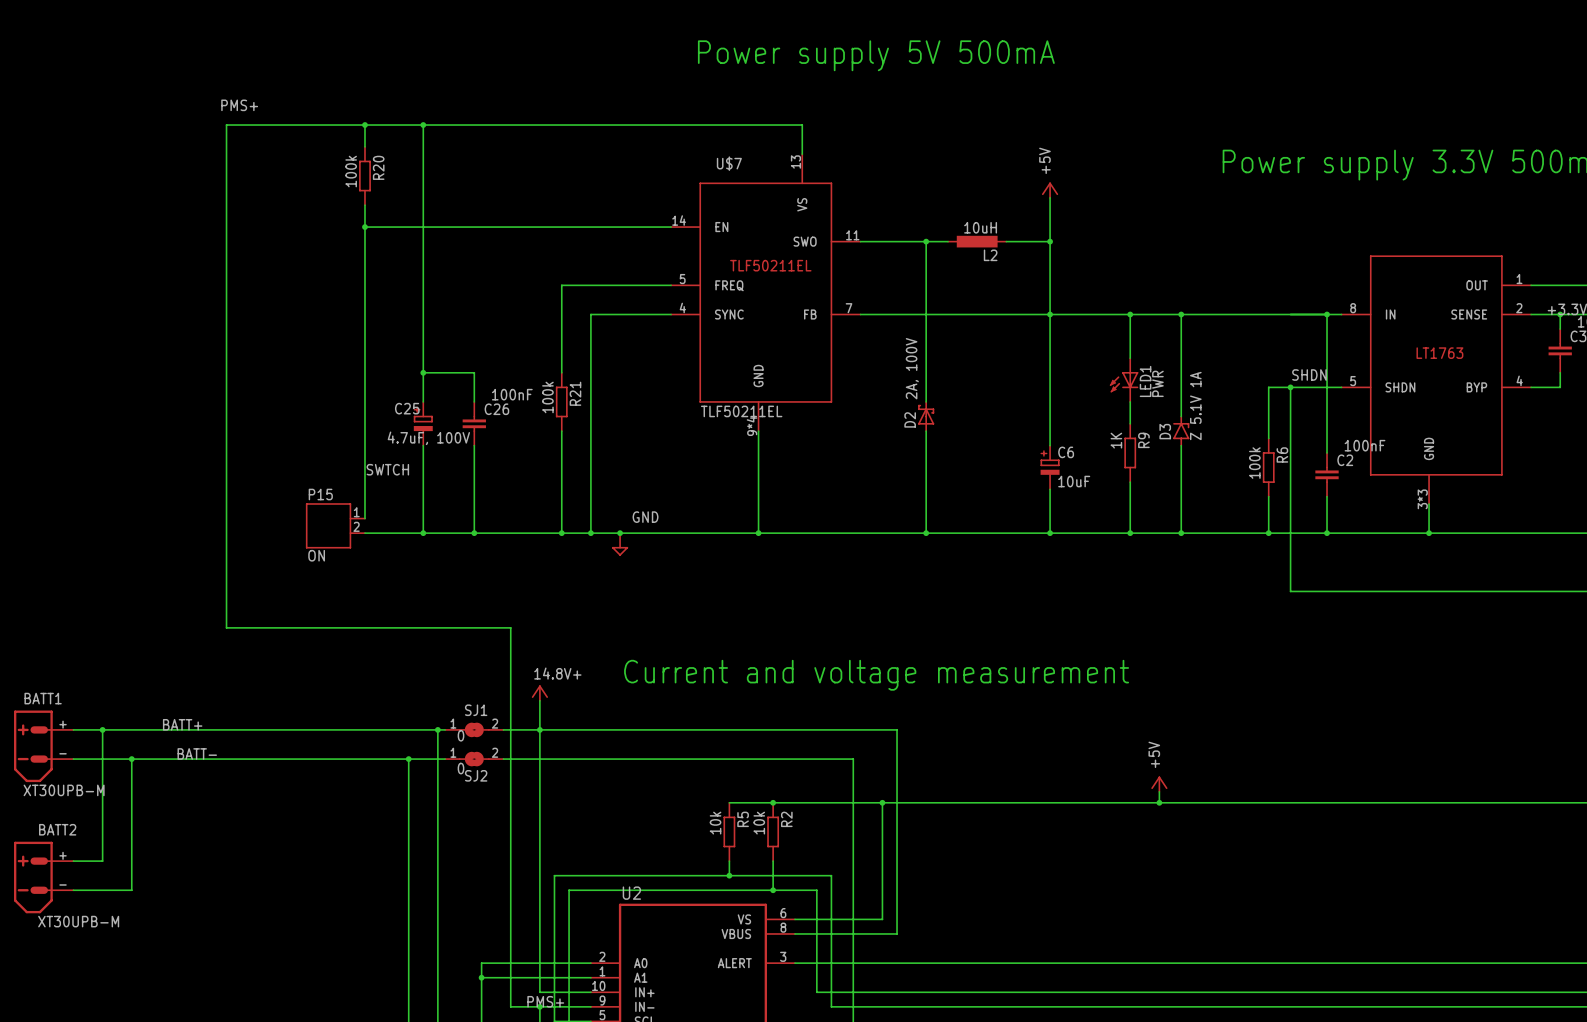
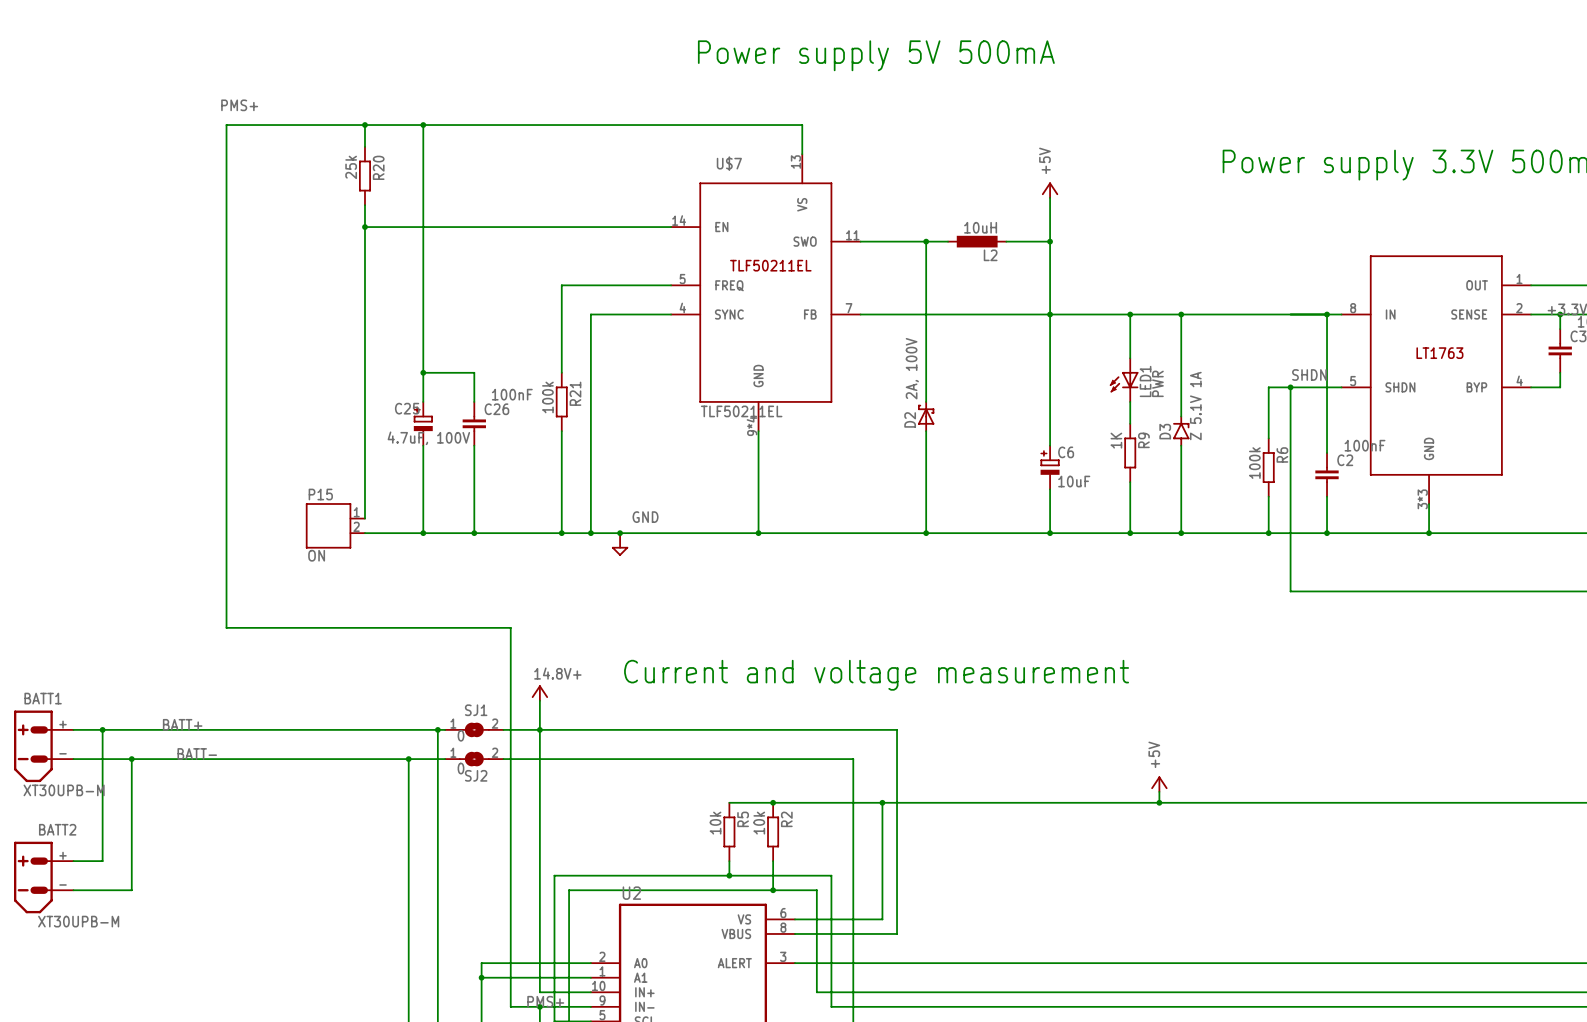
R20 value: 100k (351, 171) -> 25k (351, 167)
label: SWTCH (387, 469) -> none

